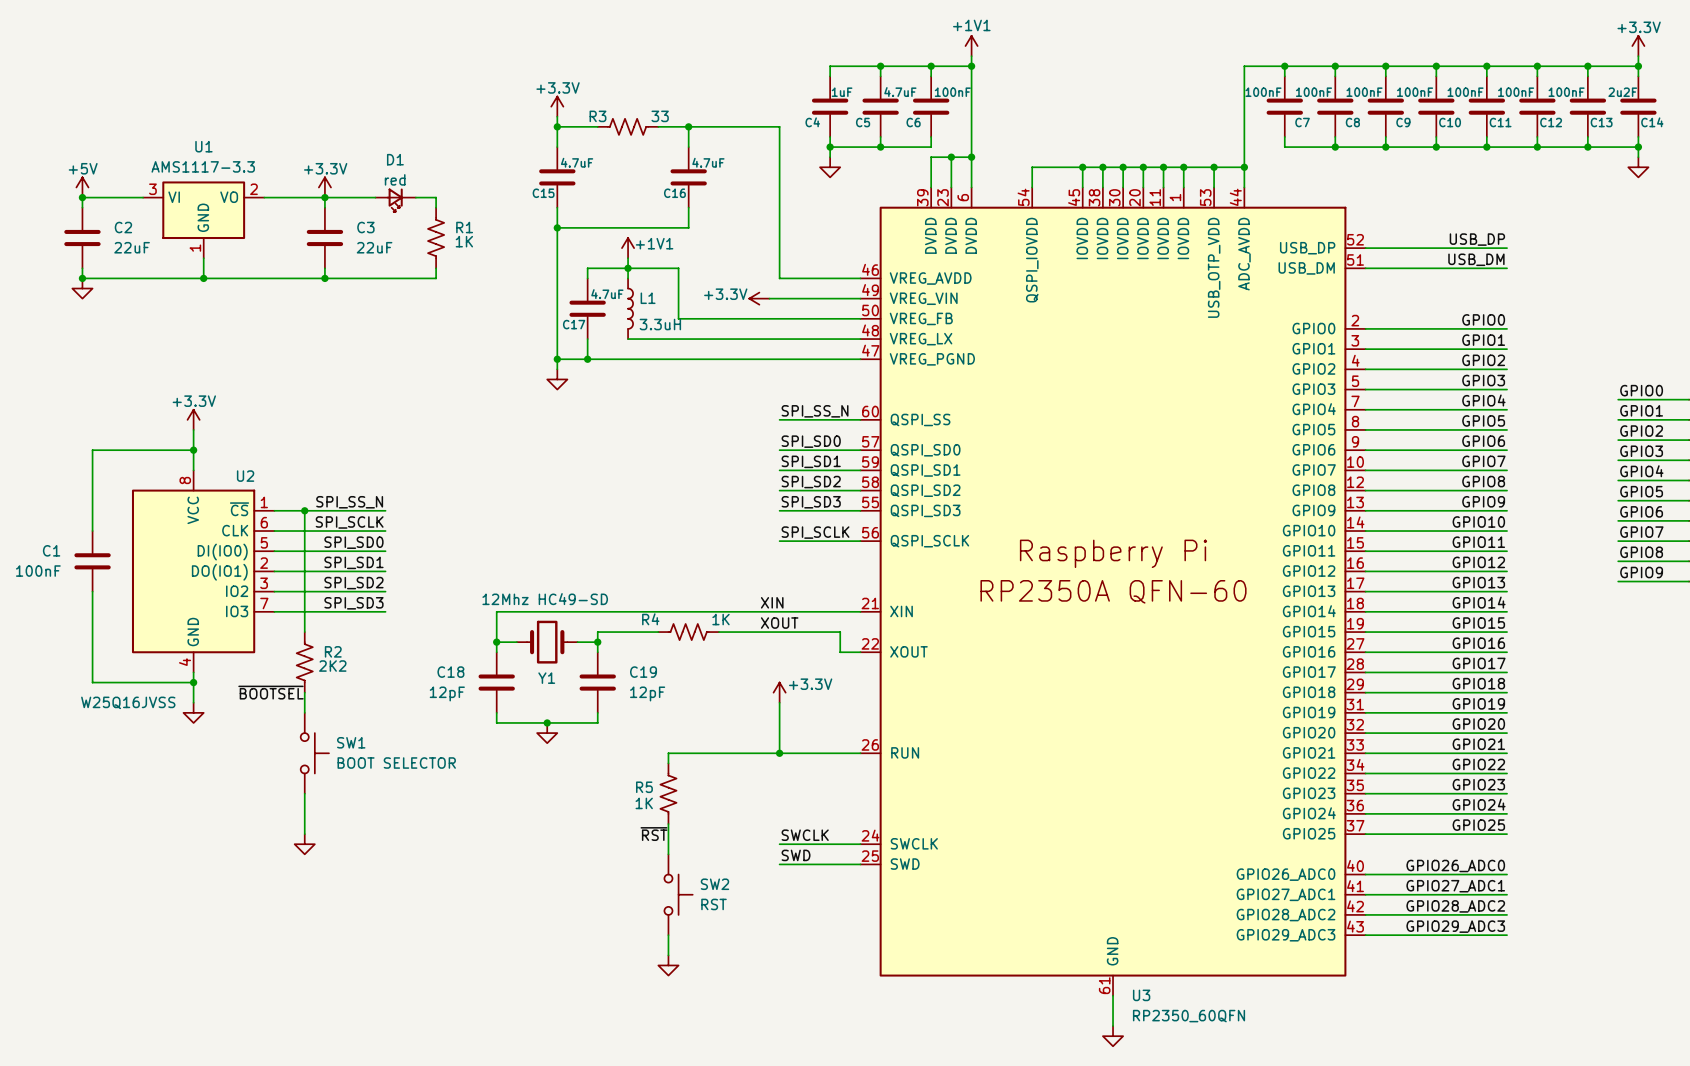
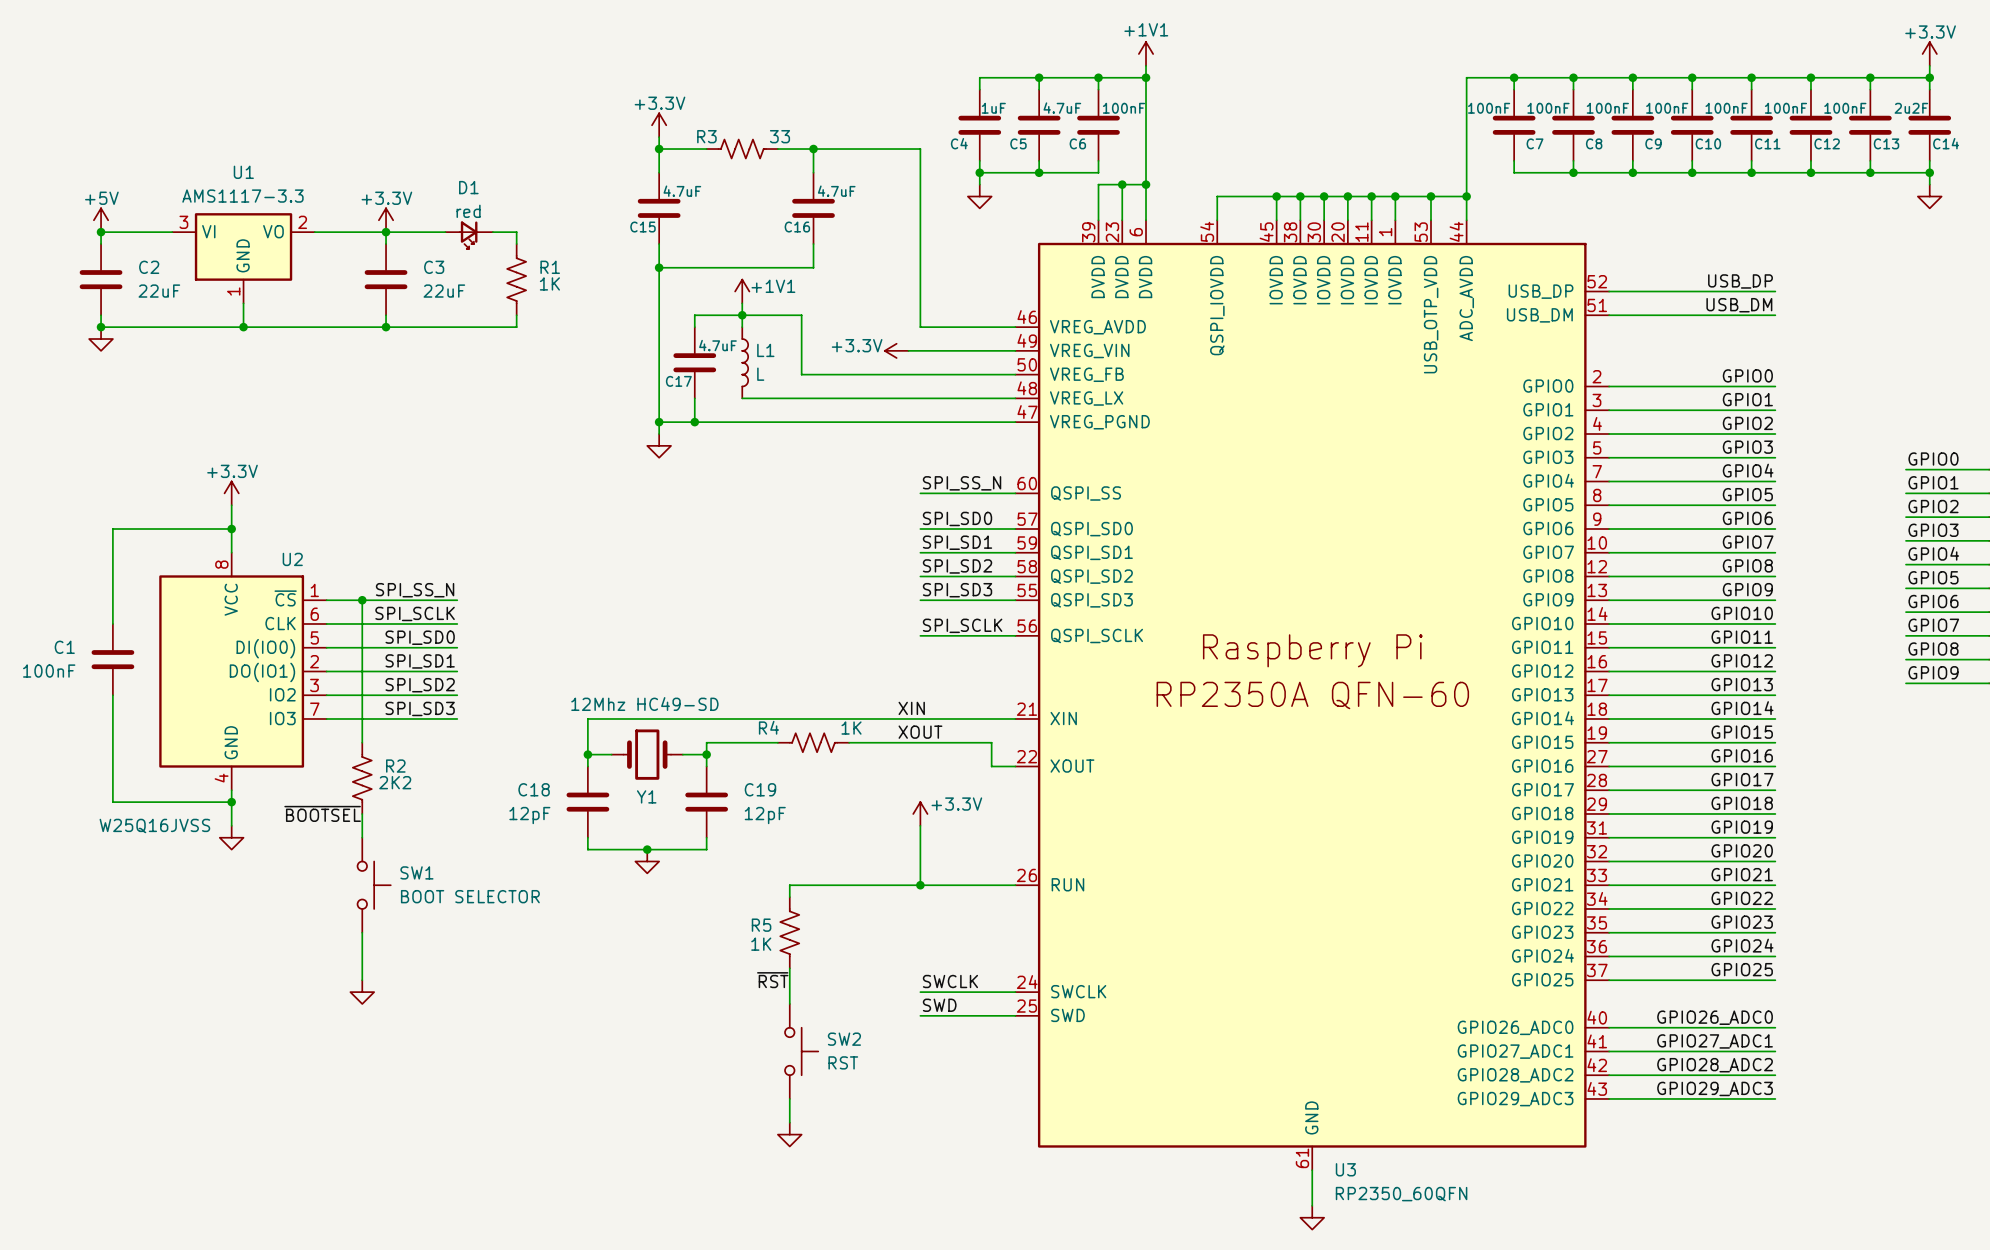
L1 value: 3.3uH (660, 324) -> L (760, 374)

